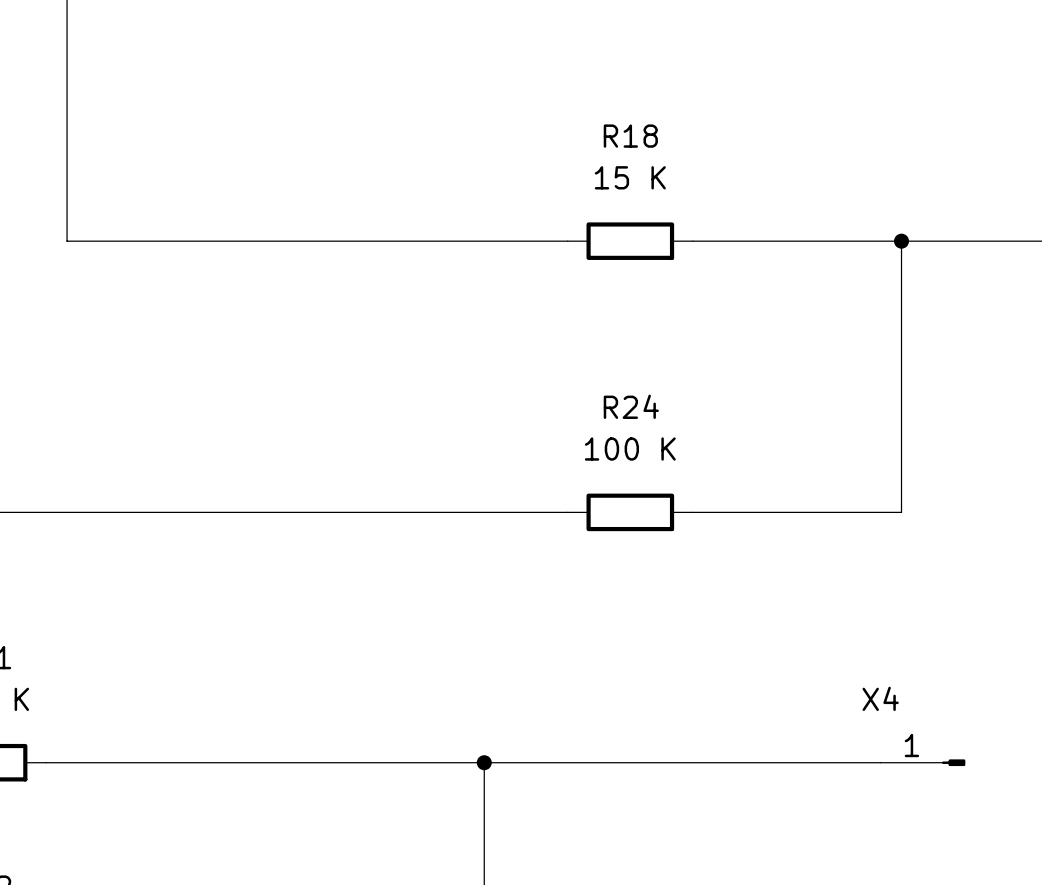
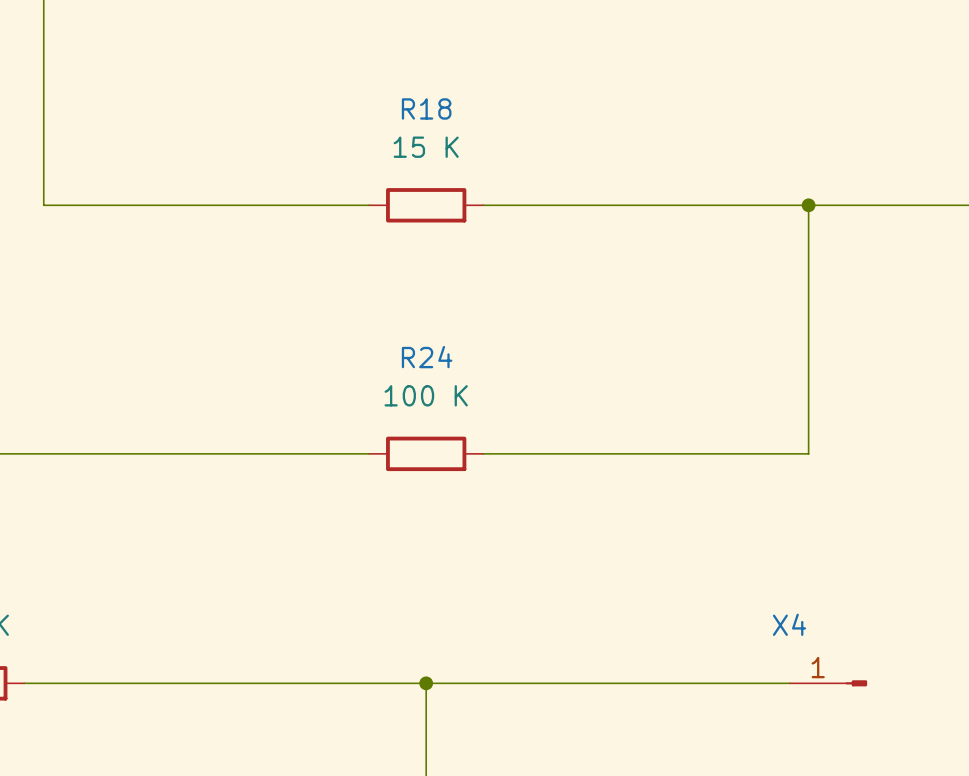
wire: (421, 241) (546, 241) -> (502, 205) (617, 205)
R18 position: (630, 241) -> (426, 205)
wire: (421, 512) (546, 512) -> (502, 453) (617, 453)
R24 position: (630, 512) -> (426, 453)

